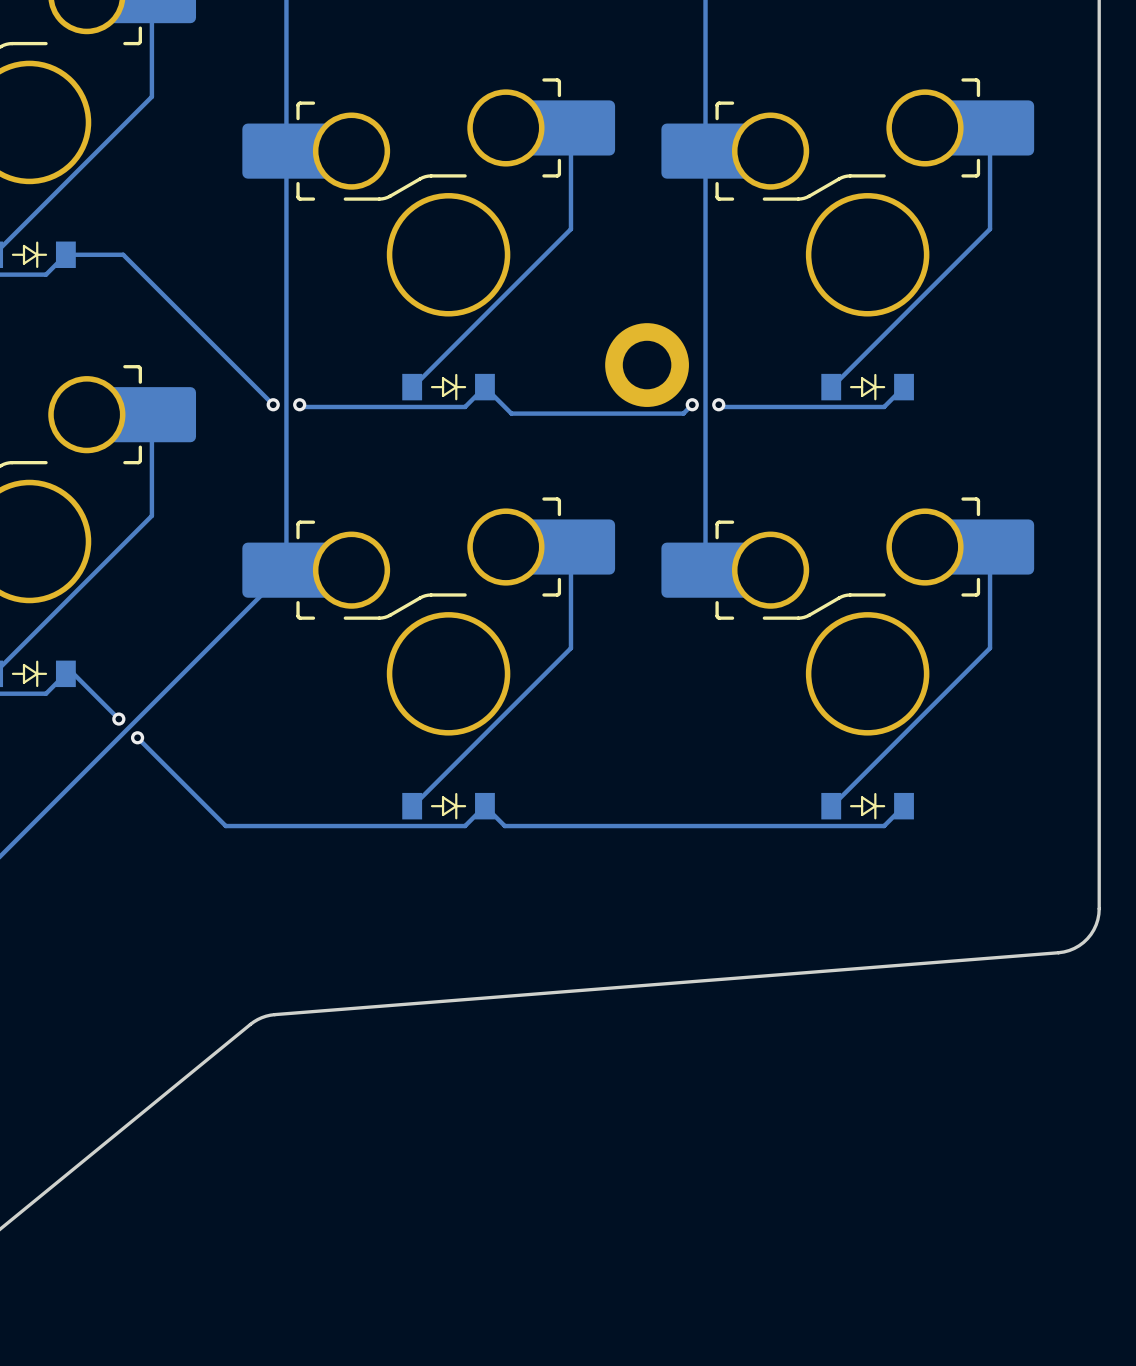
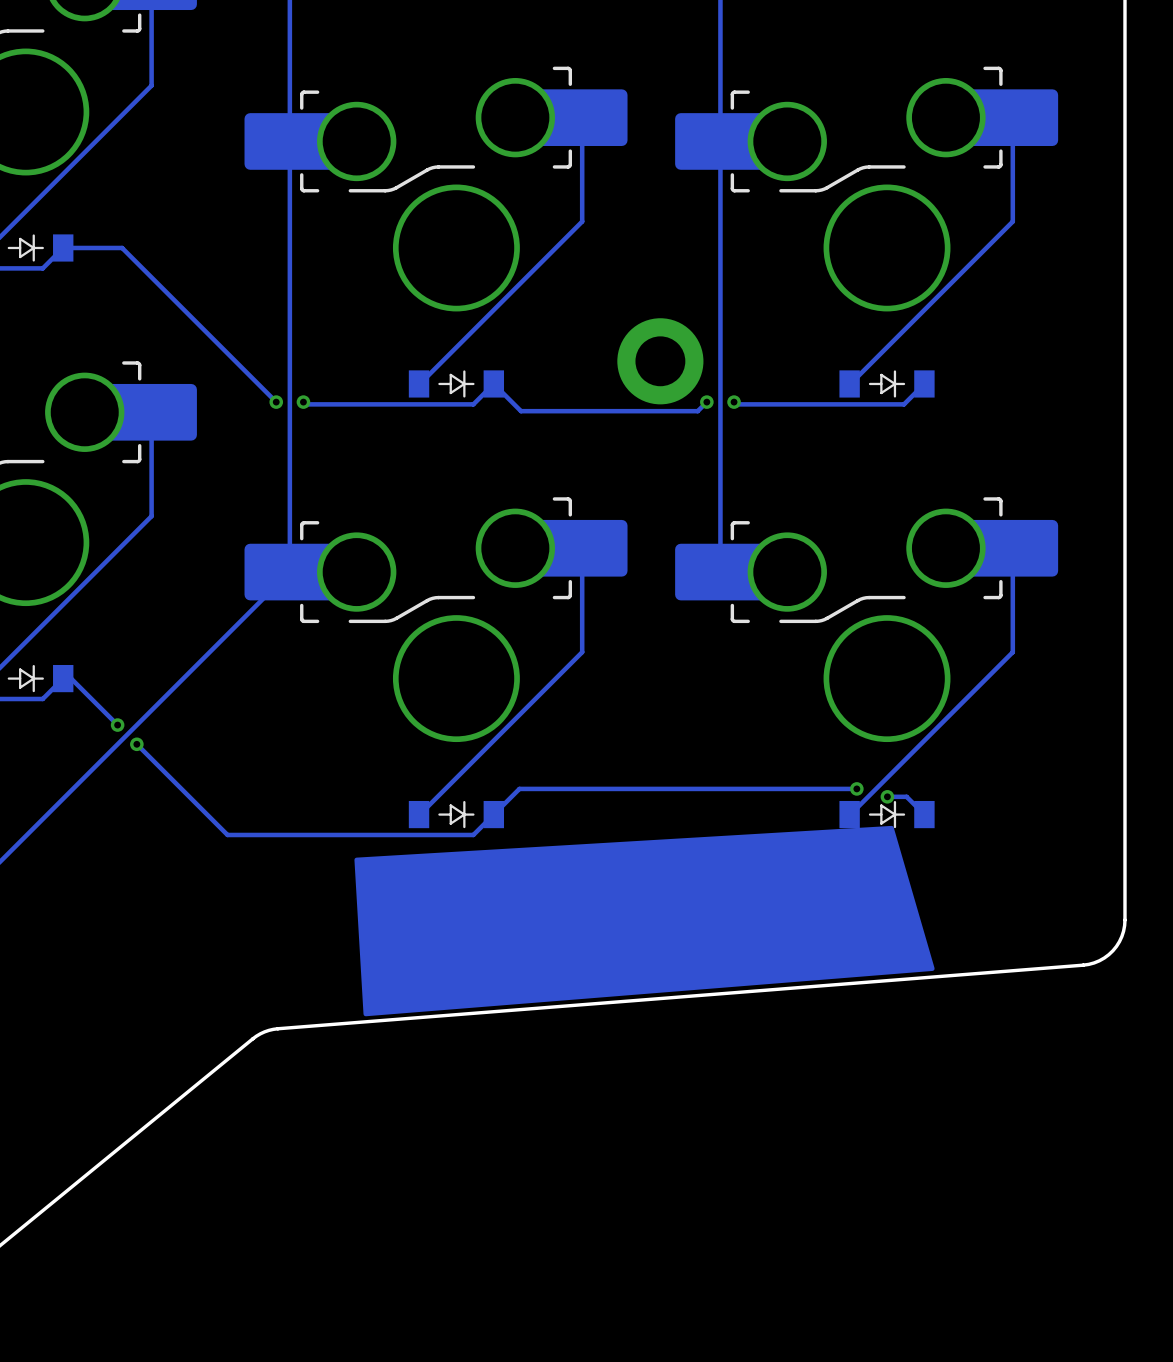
via: none -> (856, 788)
track: none -> (887, 796) (906, 796) (924, 814)
via: none -> (887, 796)
track: (904, 806) (884, 826) (504, 826) (484, 806) -> (856, 788) (519, 788) (493, 814)
drawing: none -> [354, 825, 935, 1017]

